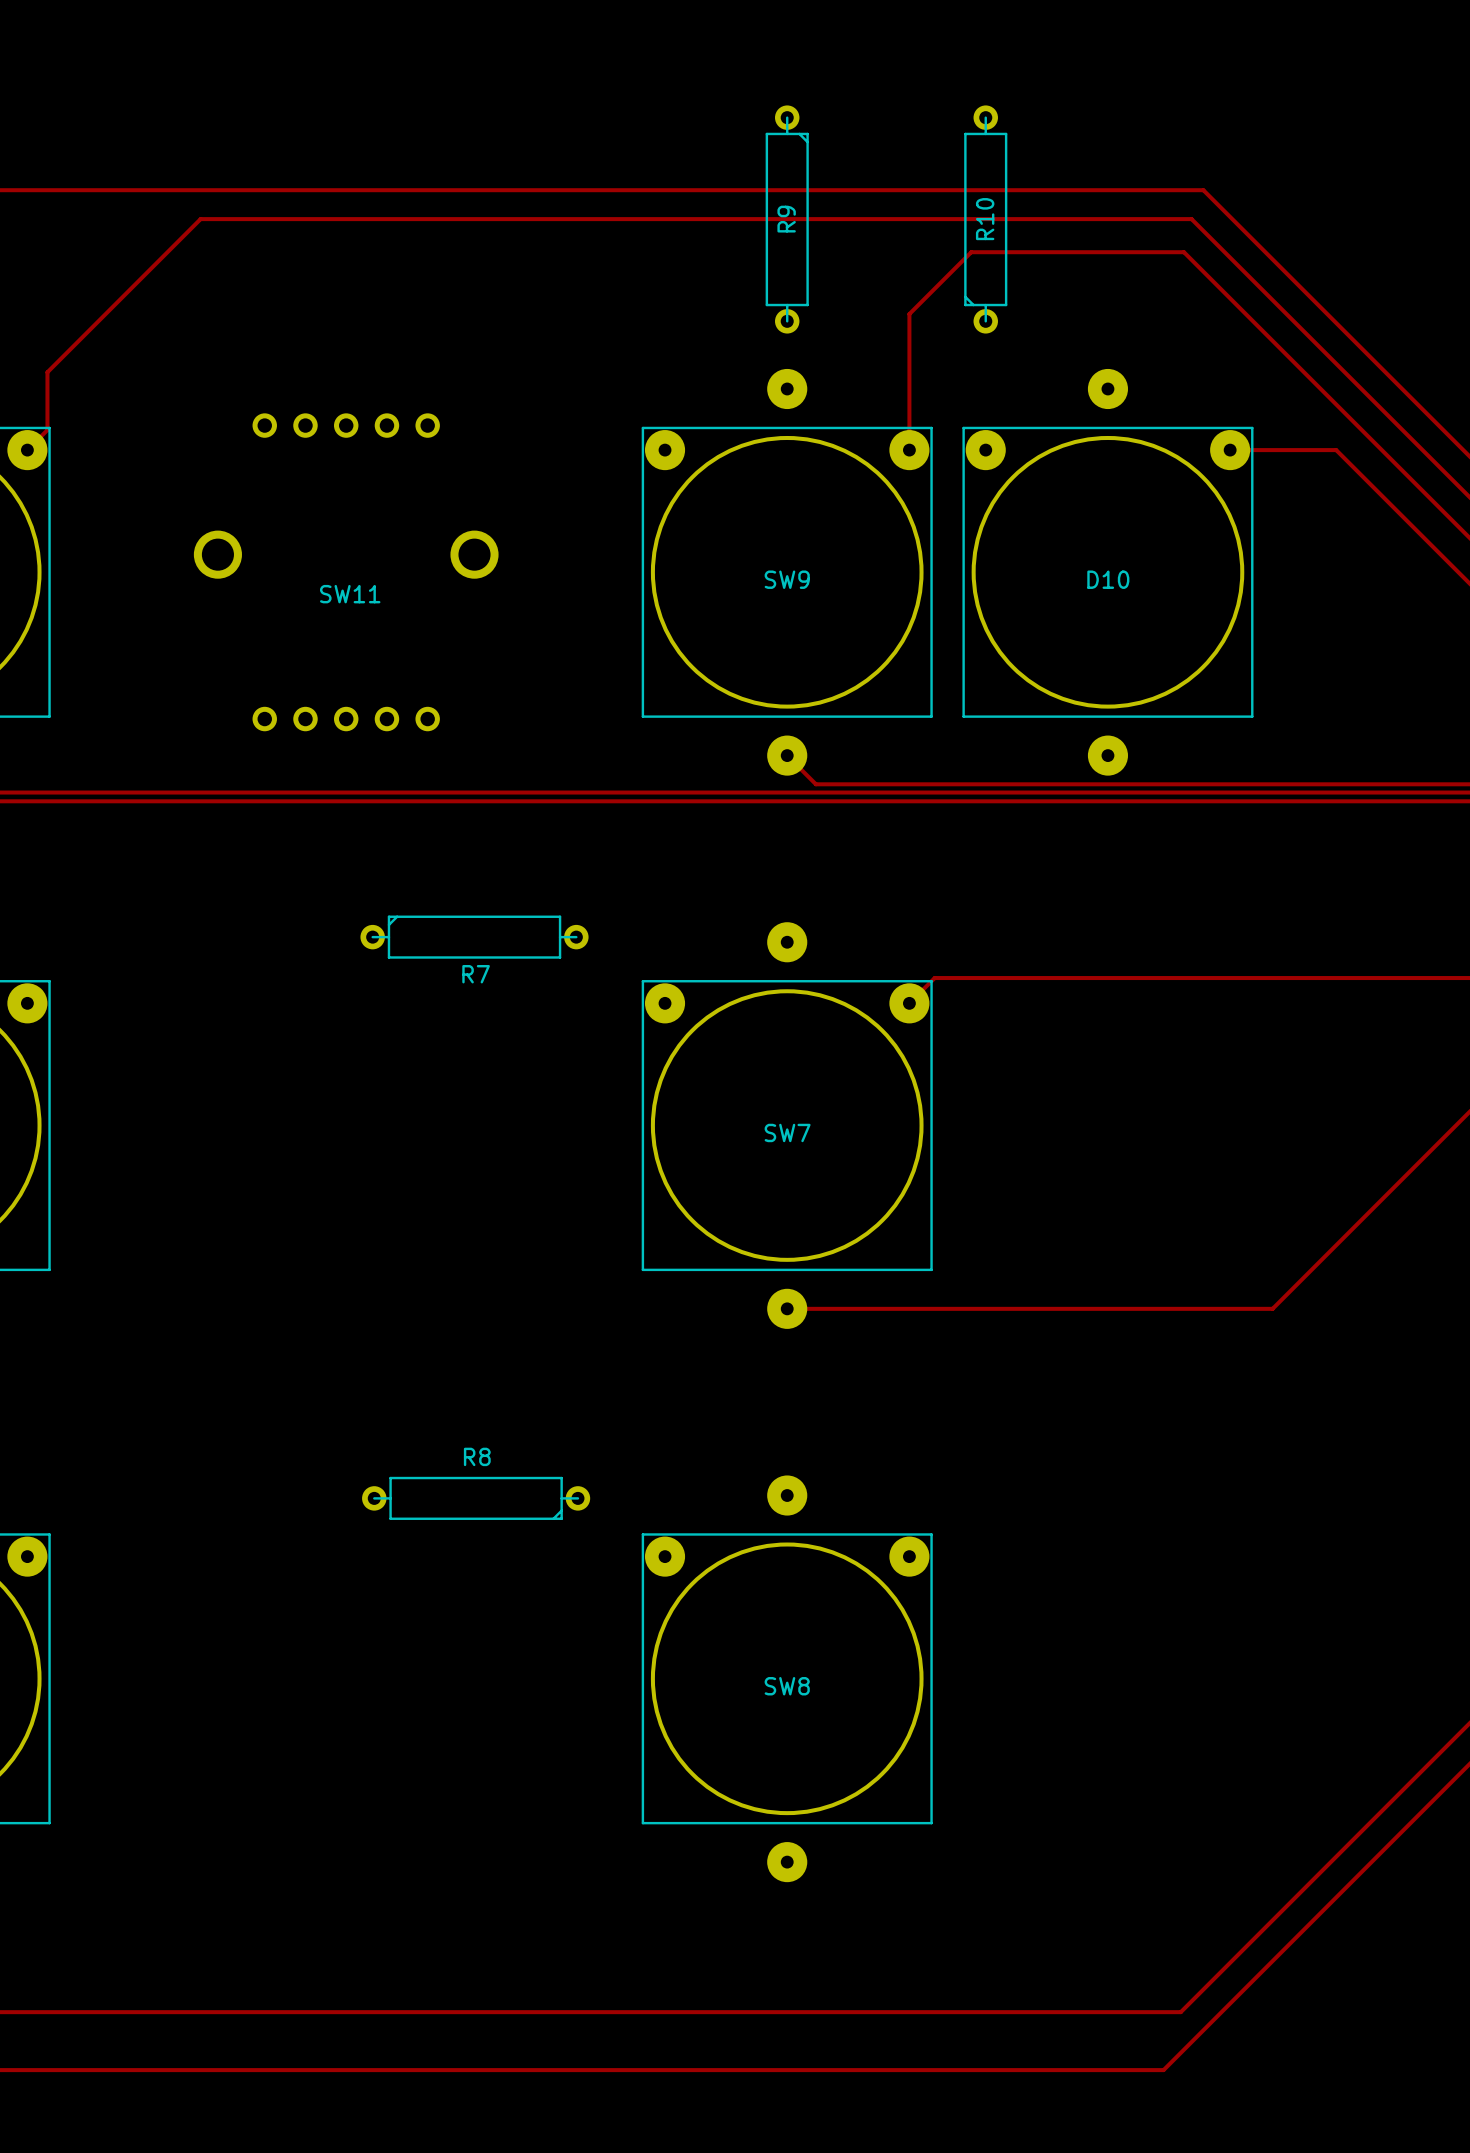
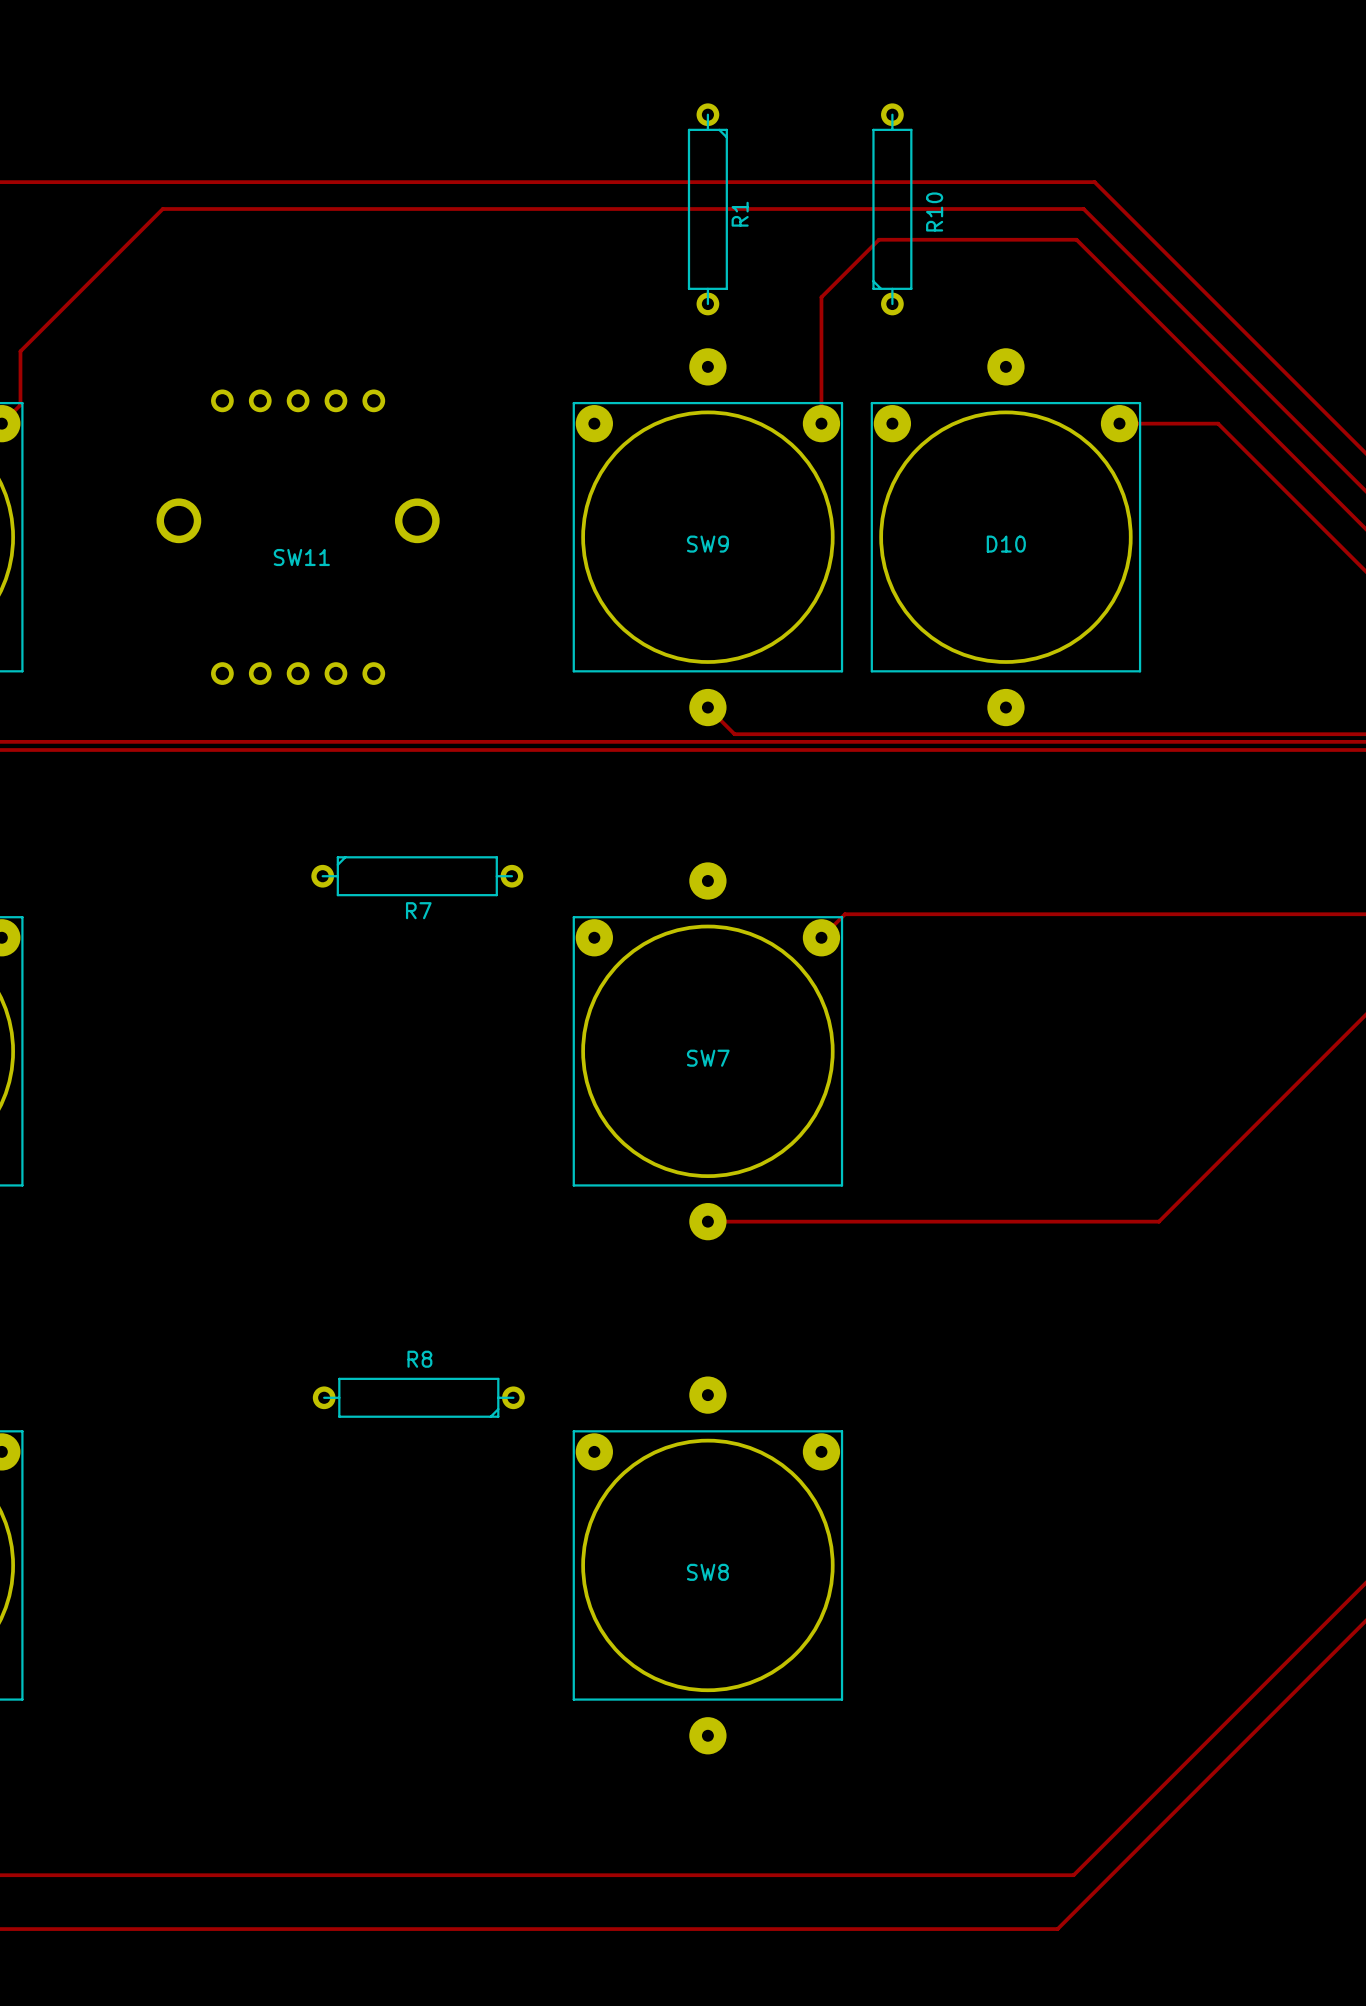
R9 name: R9 (786, 219) -> R1 (740, 214)
R10 name position: R10 (985, 219) -> R10 (934, 211)

